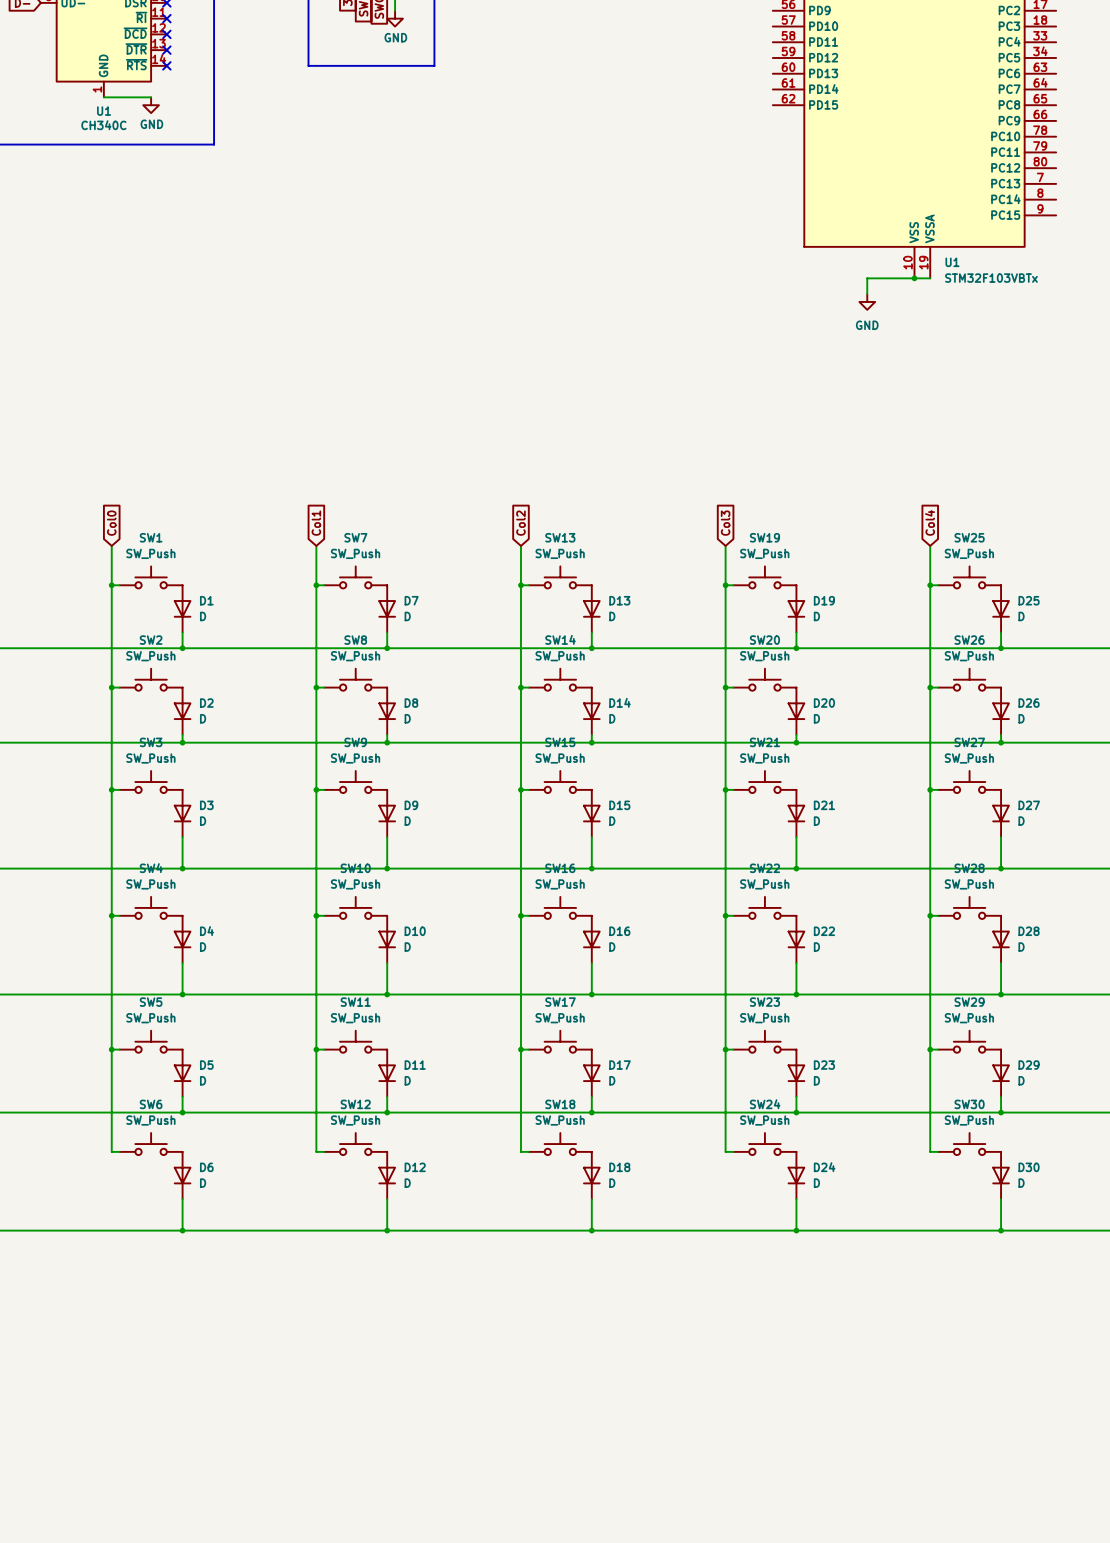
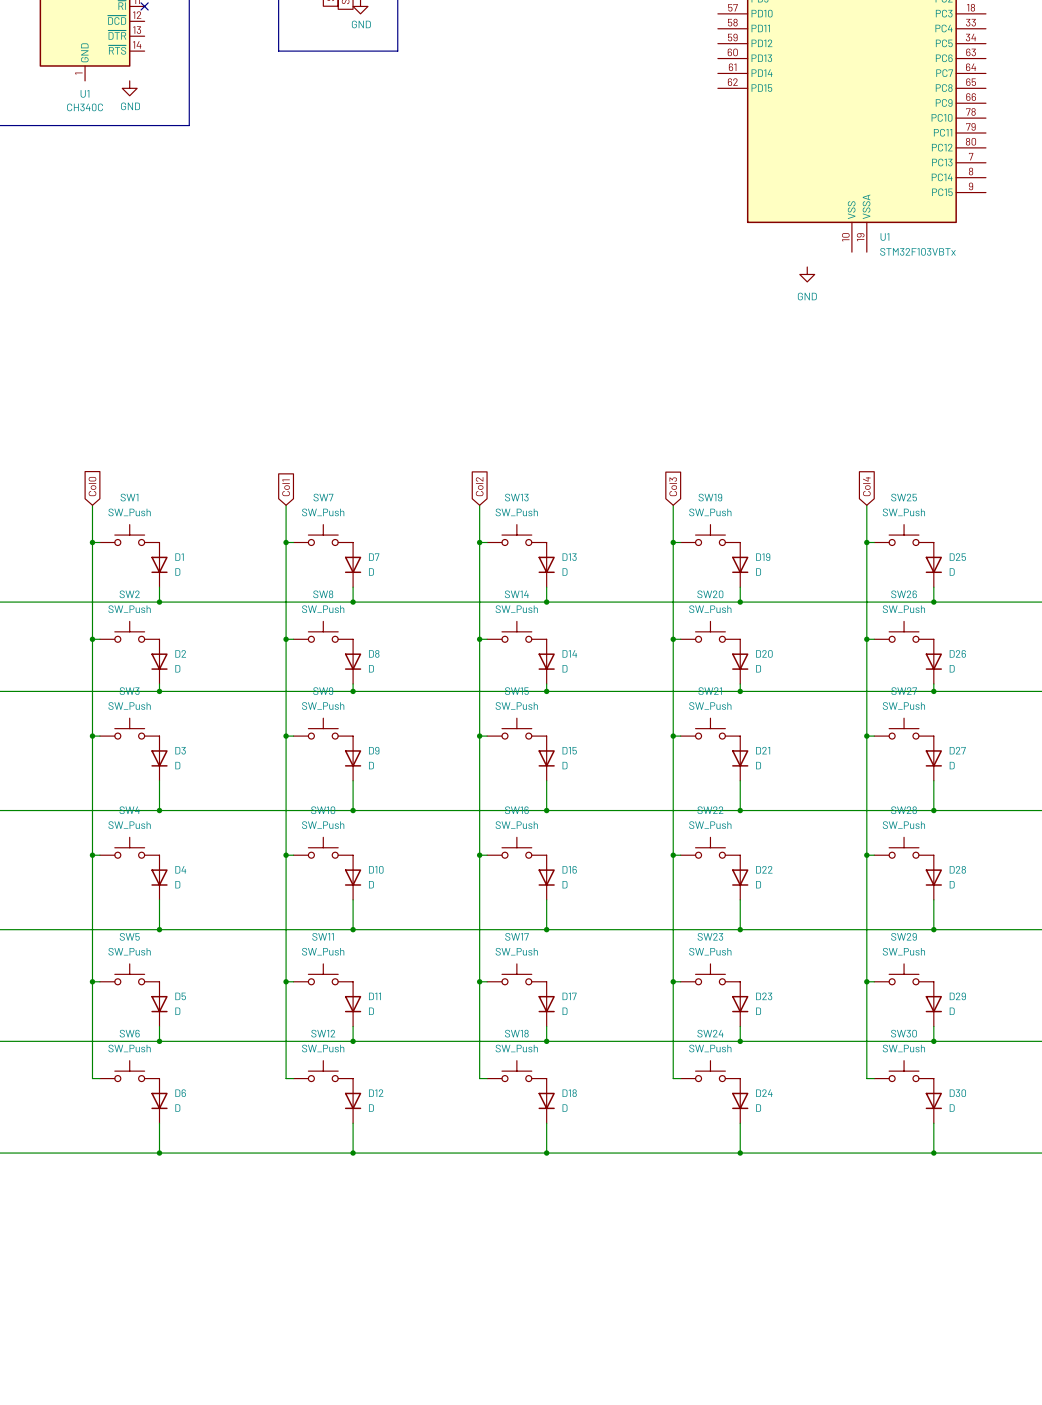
no-connect mark: (166, 34) -> none
no-connect mark: (166, 50) -> none
no-connect mark: (166, 65) -> none
wire: (103, 97) (151, 97) -> none
junction: (914, 278) -> none
wire: (930, 278) (867, 278) (867, 294) -> none

